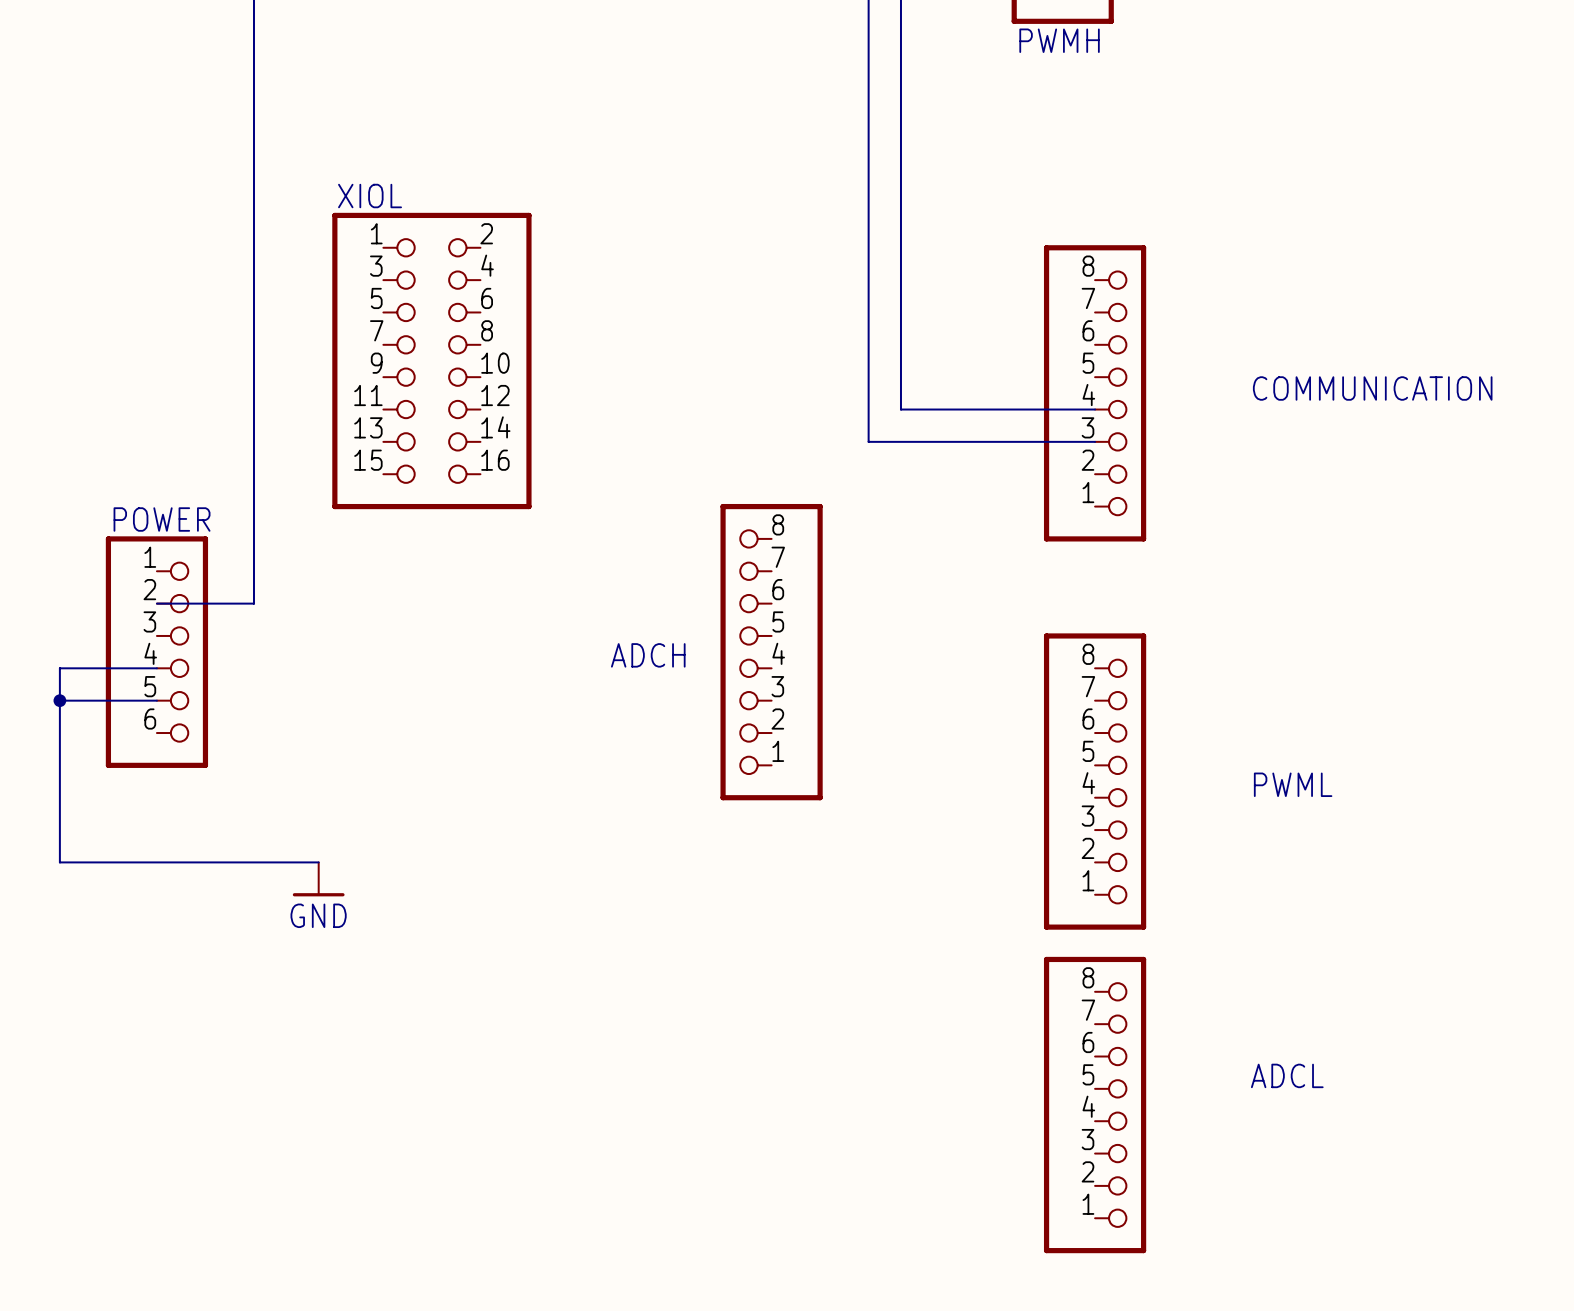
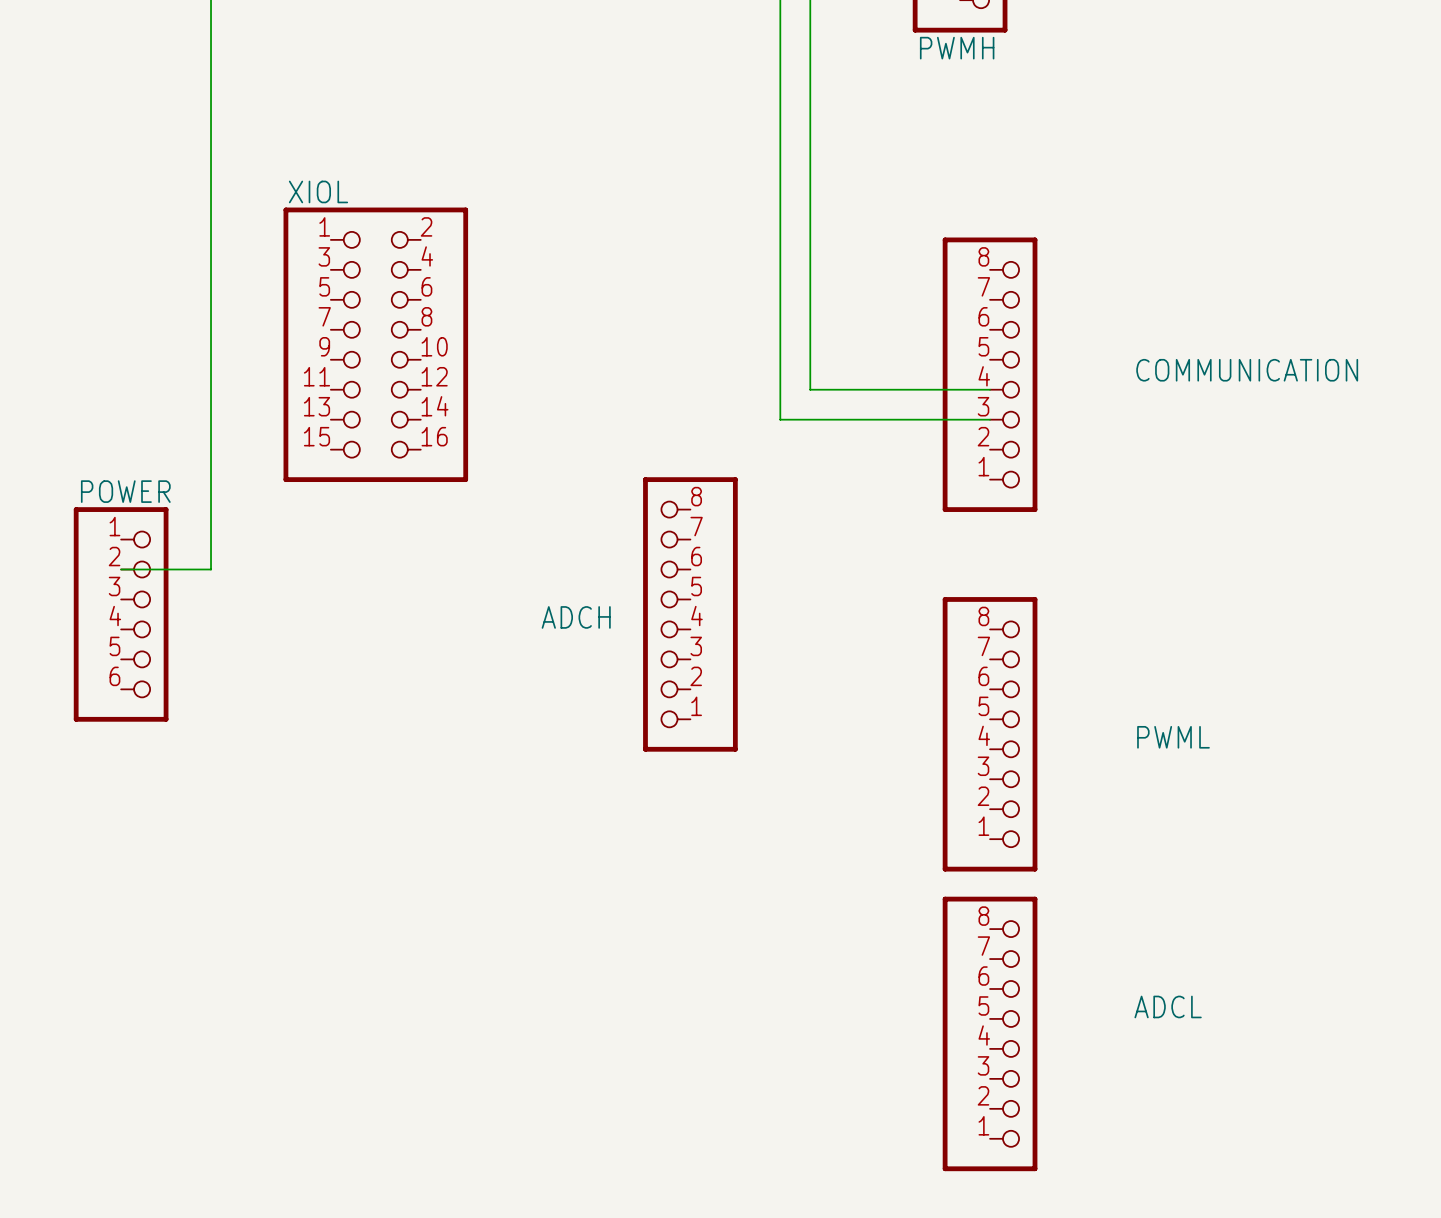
wire: (156, 668) (59, 668) (59, 862) (318, 862) -> none
wire: (59, 700) (156, 700) -> none
junction: (59, 700) -> none
power symbol: GND (318, 879) -> none

